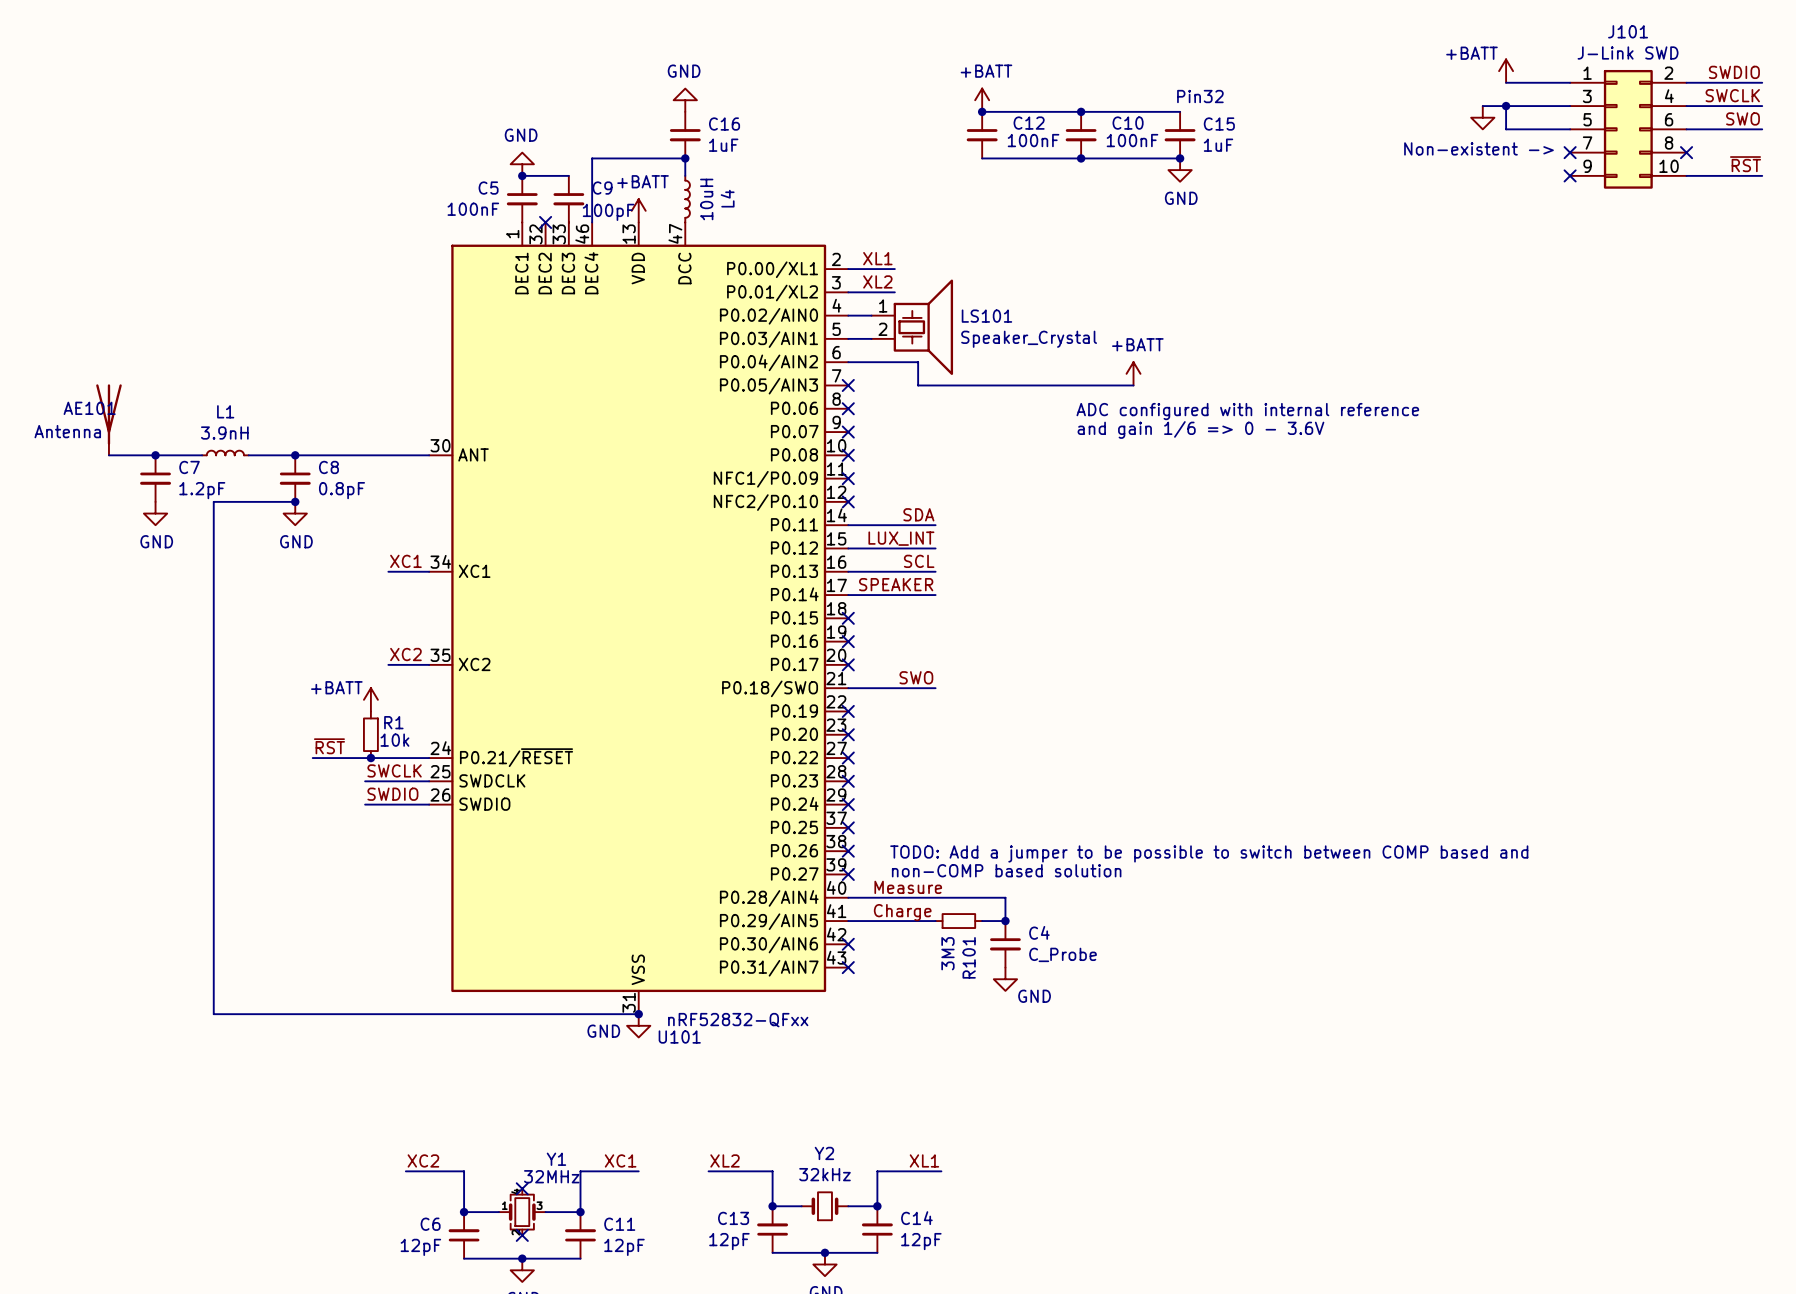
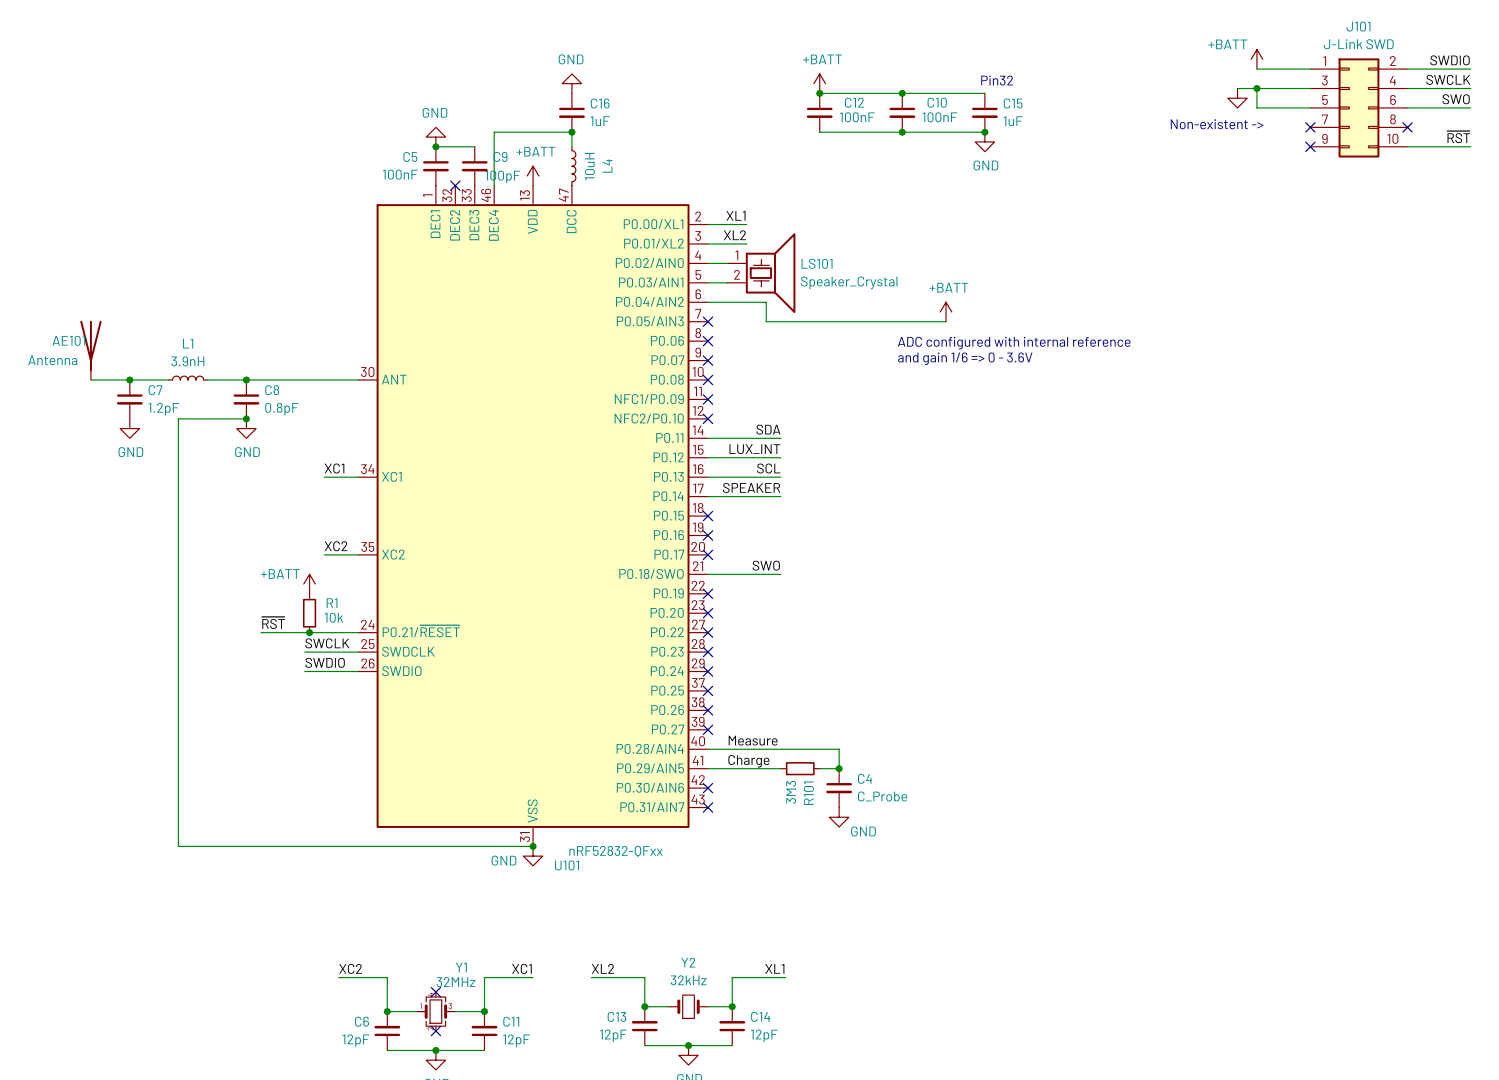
text: TODO: Add a jumper to be possible to switch between COMP based and (1209, 853) -> none
text: non-COMP based solution (1006, 870) -> none

